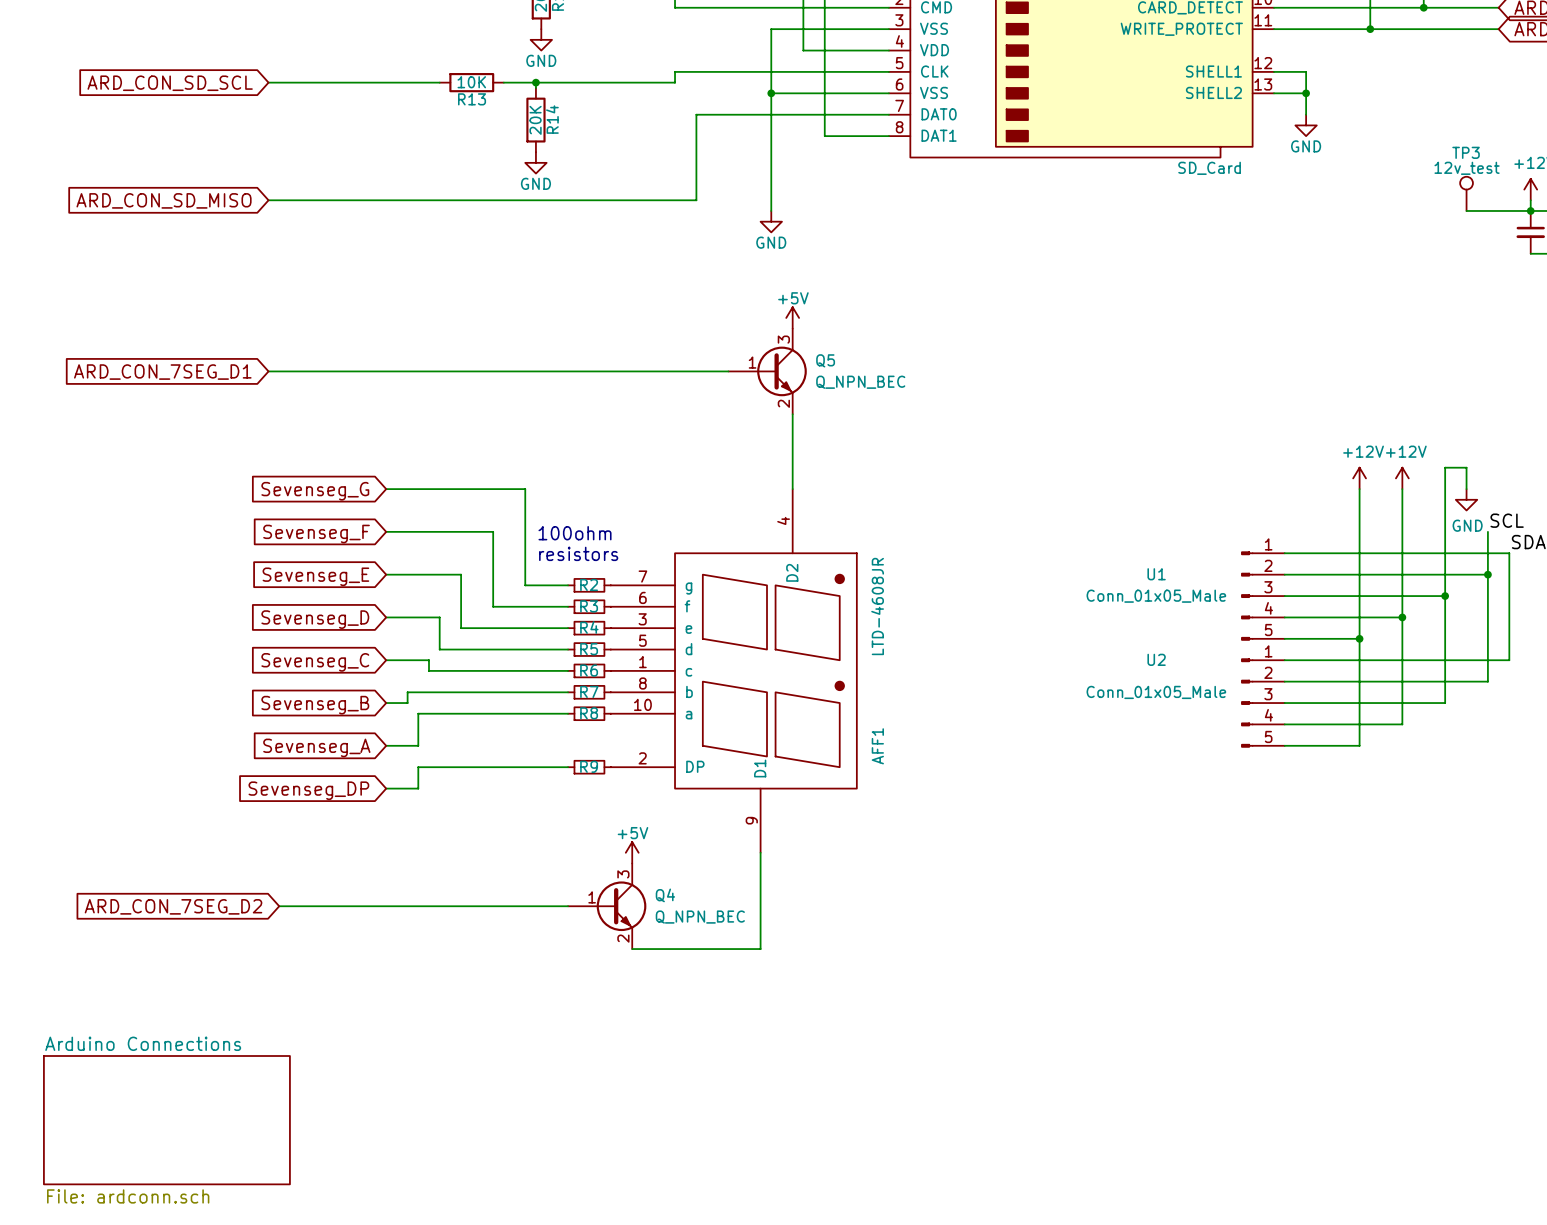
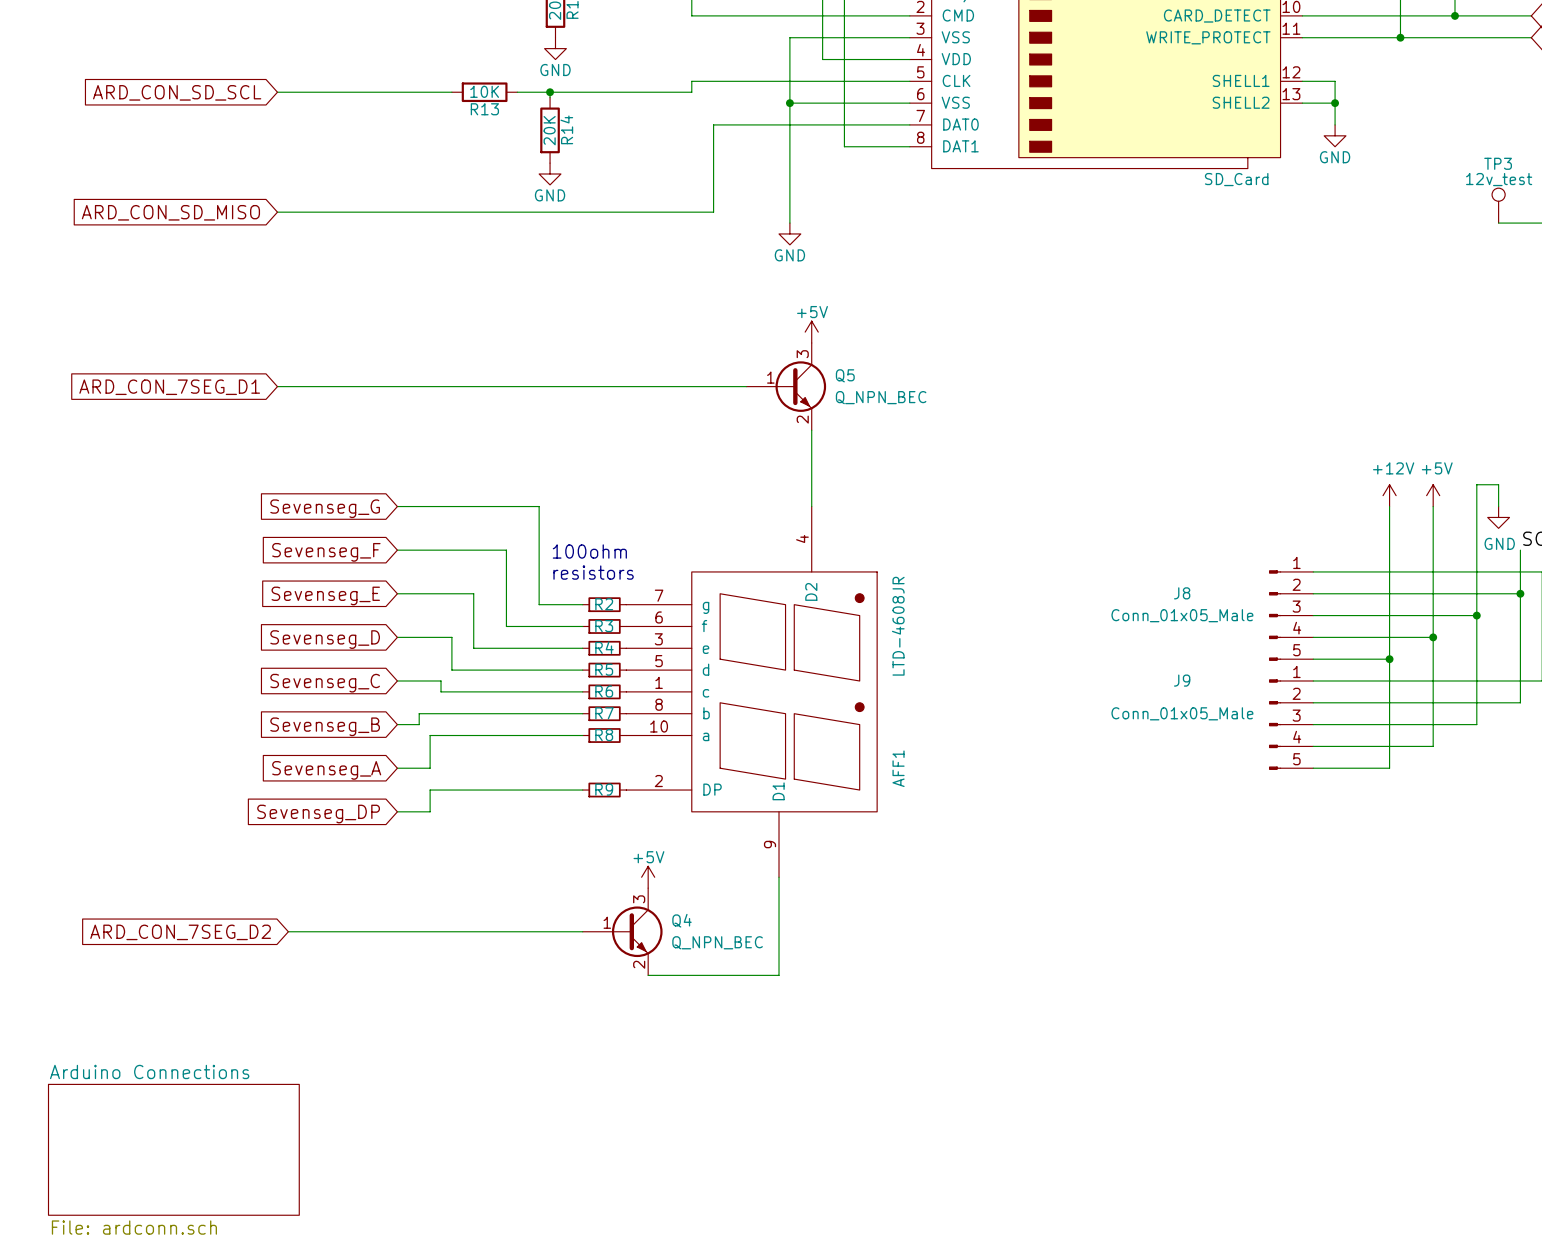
power symbol: +12V (1402, 478) -> +5V (1433, 495)
U1 name: U1 (1156, 574) -> J8 (1182, 593)
U2 name: U2 (1156, 659) -> J9 (1182, 680)

